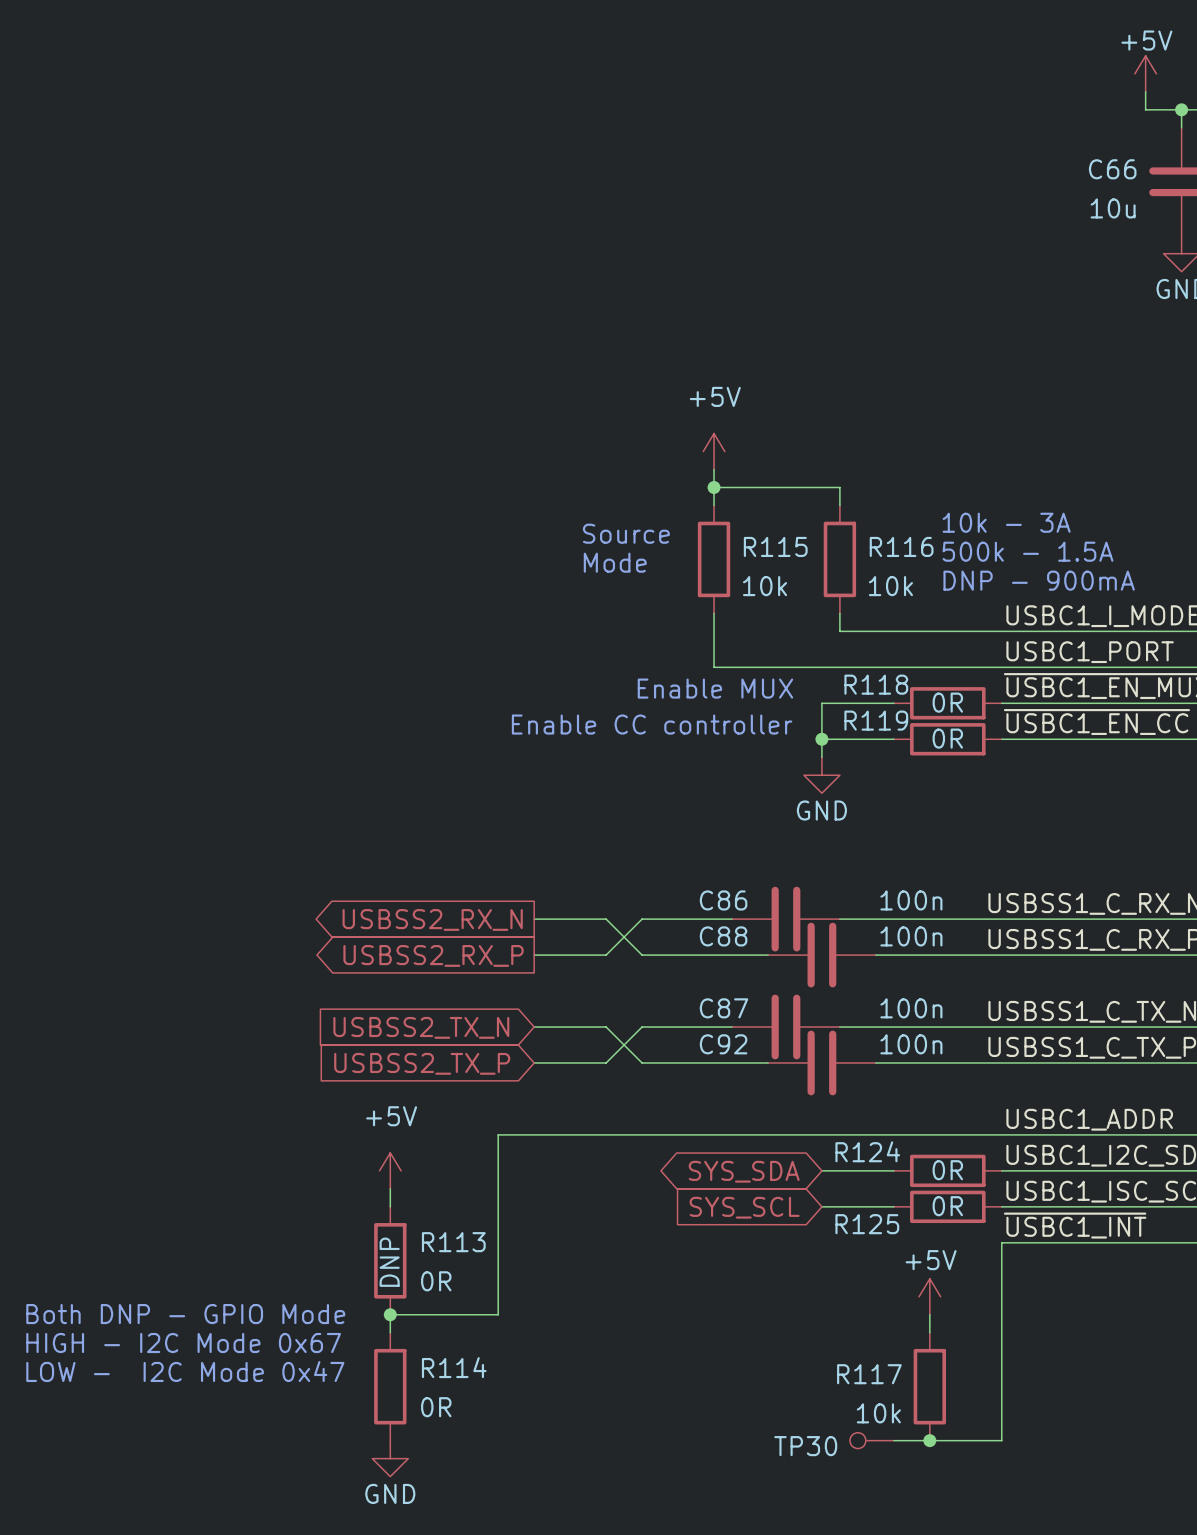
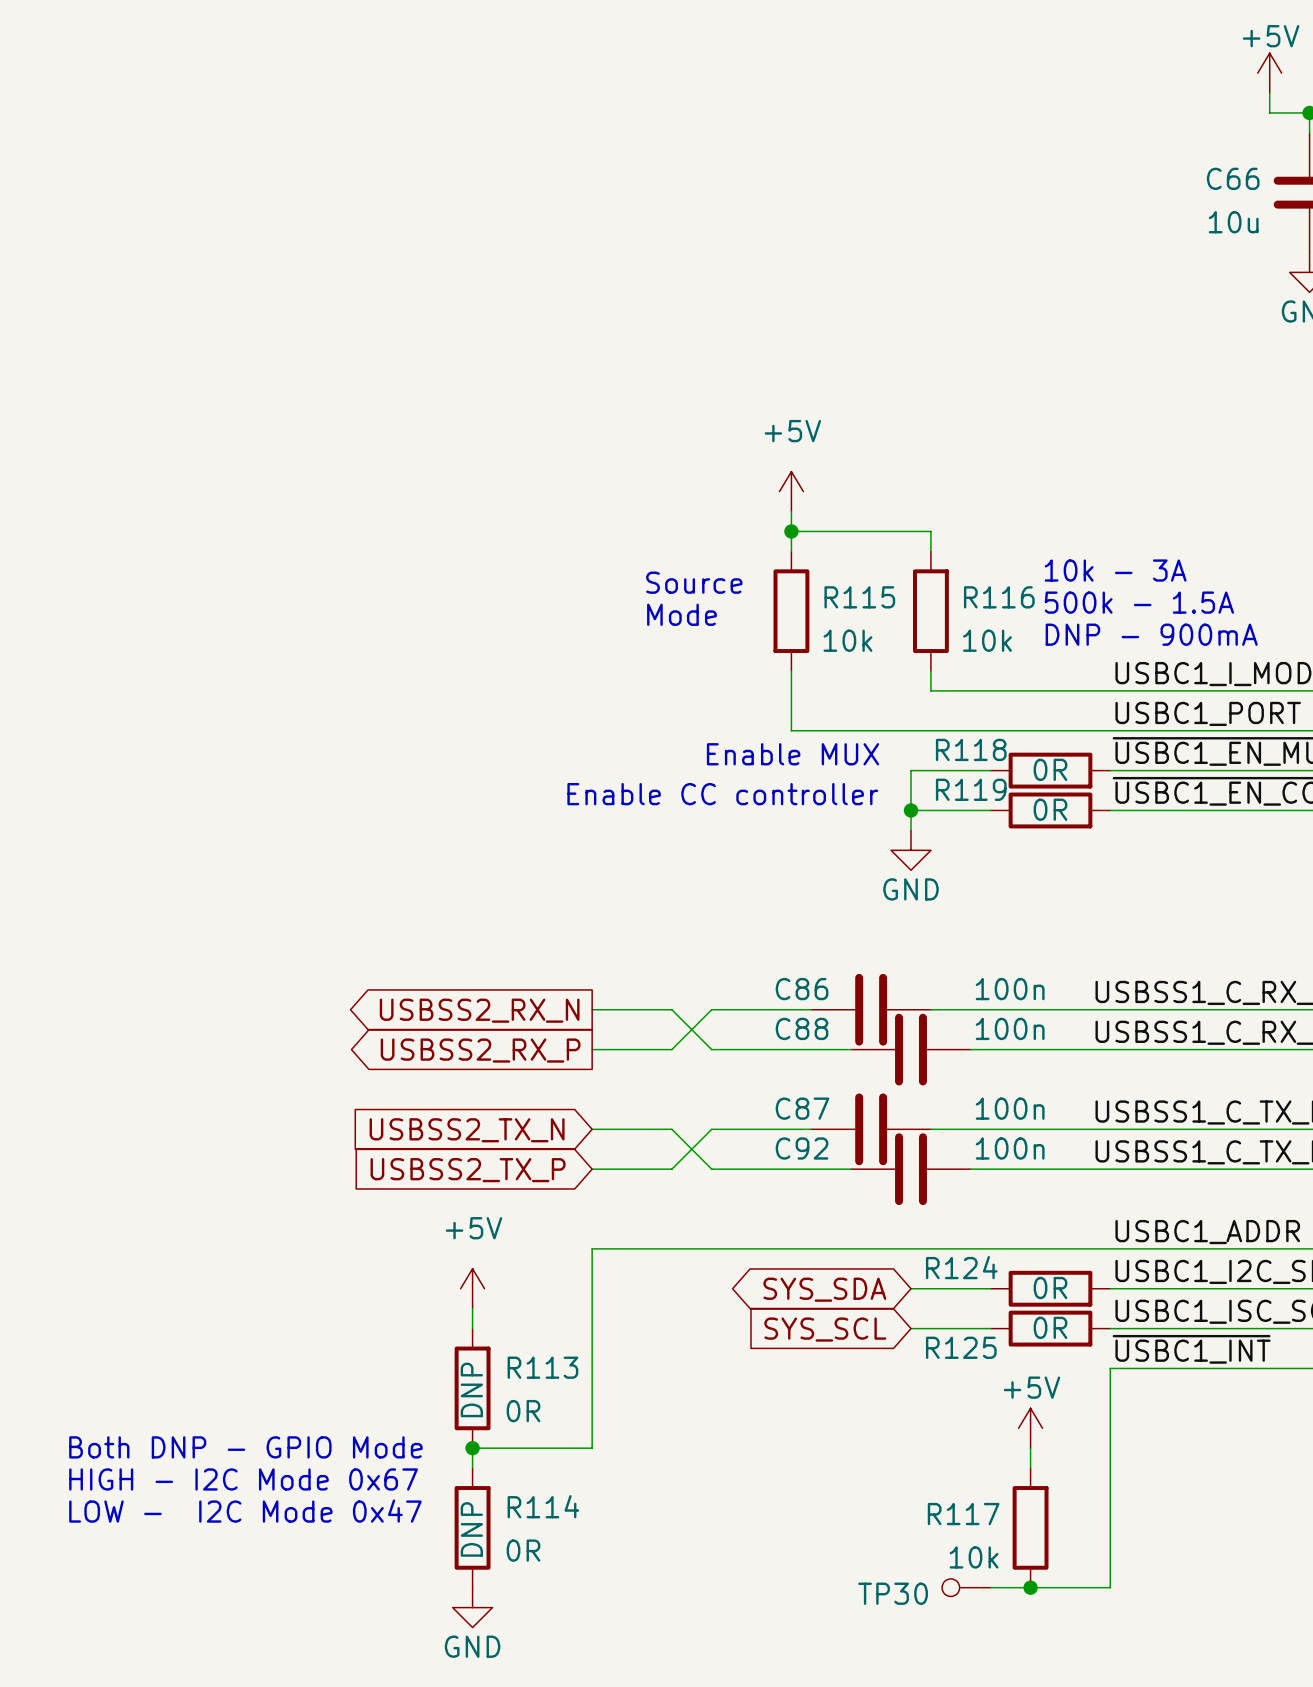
wire: (534, 1134) (498, 1134) (498, 1314) -> (592, 1248) (592, 1448) (552, 1448)
power symbol position: +5V (390, 1170) -> +5V (472, 1288)
wire: (390, 1188) (390, 1206) -> (472, 1308) (472, 1328)
R113 position: (390, 1260) -> (472, 1388)
text position: Both DNP - GPIO Mode (185, 1314) -> Both DNP - GPIO Mode (245, 1447)
junction position: (390, 1314) -> (472, 1448)
wire: (426, 1314) (390, 1314) (390, 1332) -> (472, 1448) (472, 1468)
text position: HIGH - I2C Mode 0x67 (183, 1343) -> HIGH - I2C Mode 0x67 (243, 1479)
text position: LOW - I2C Mode 0x47 (185, 1371) -> LOW - I2C Mode 0x47 (245, 1511)
R114 position: (390, 1386) -> (472, 1527)
R114 text: none -> DNP (471, 1529)
power symbol position: GND (390, 1458) -> GND (472, 1607)

